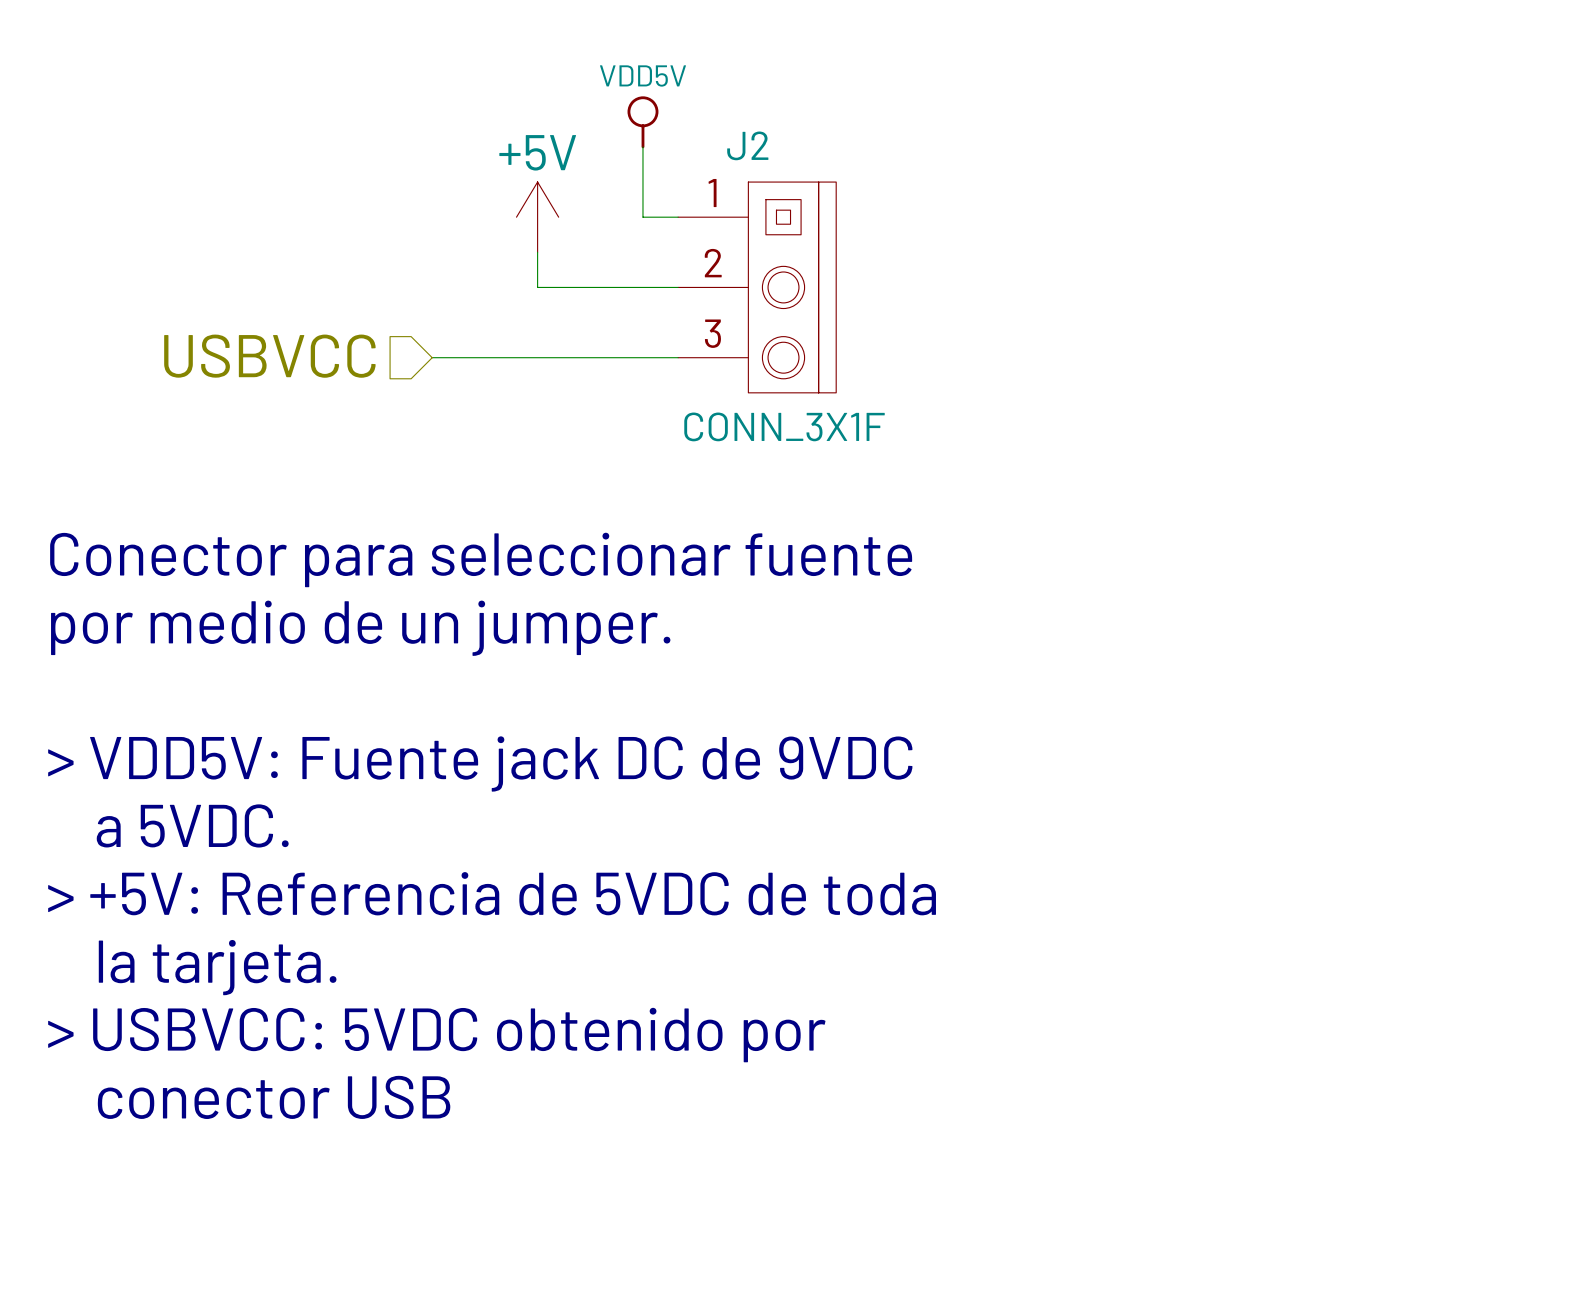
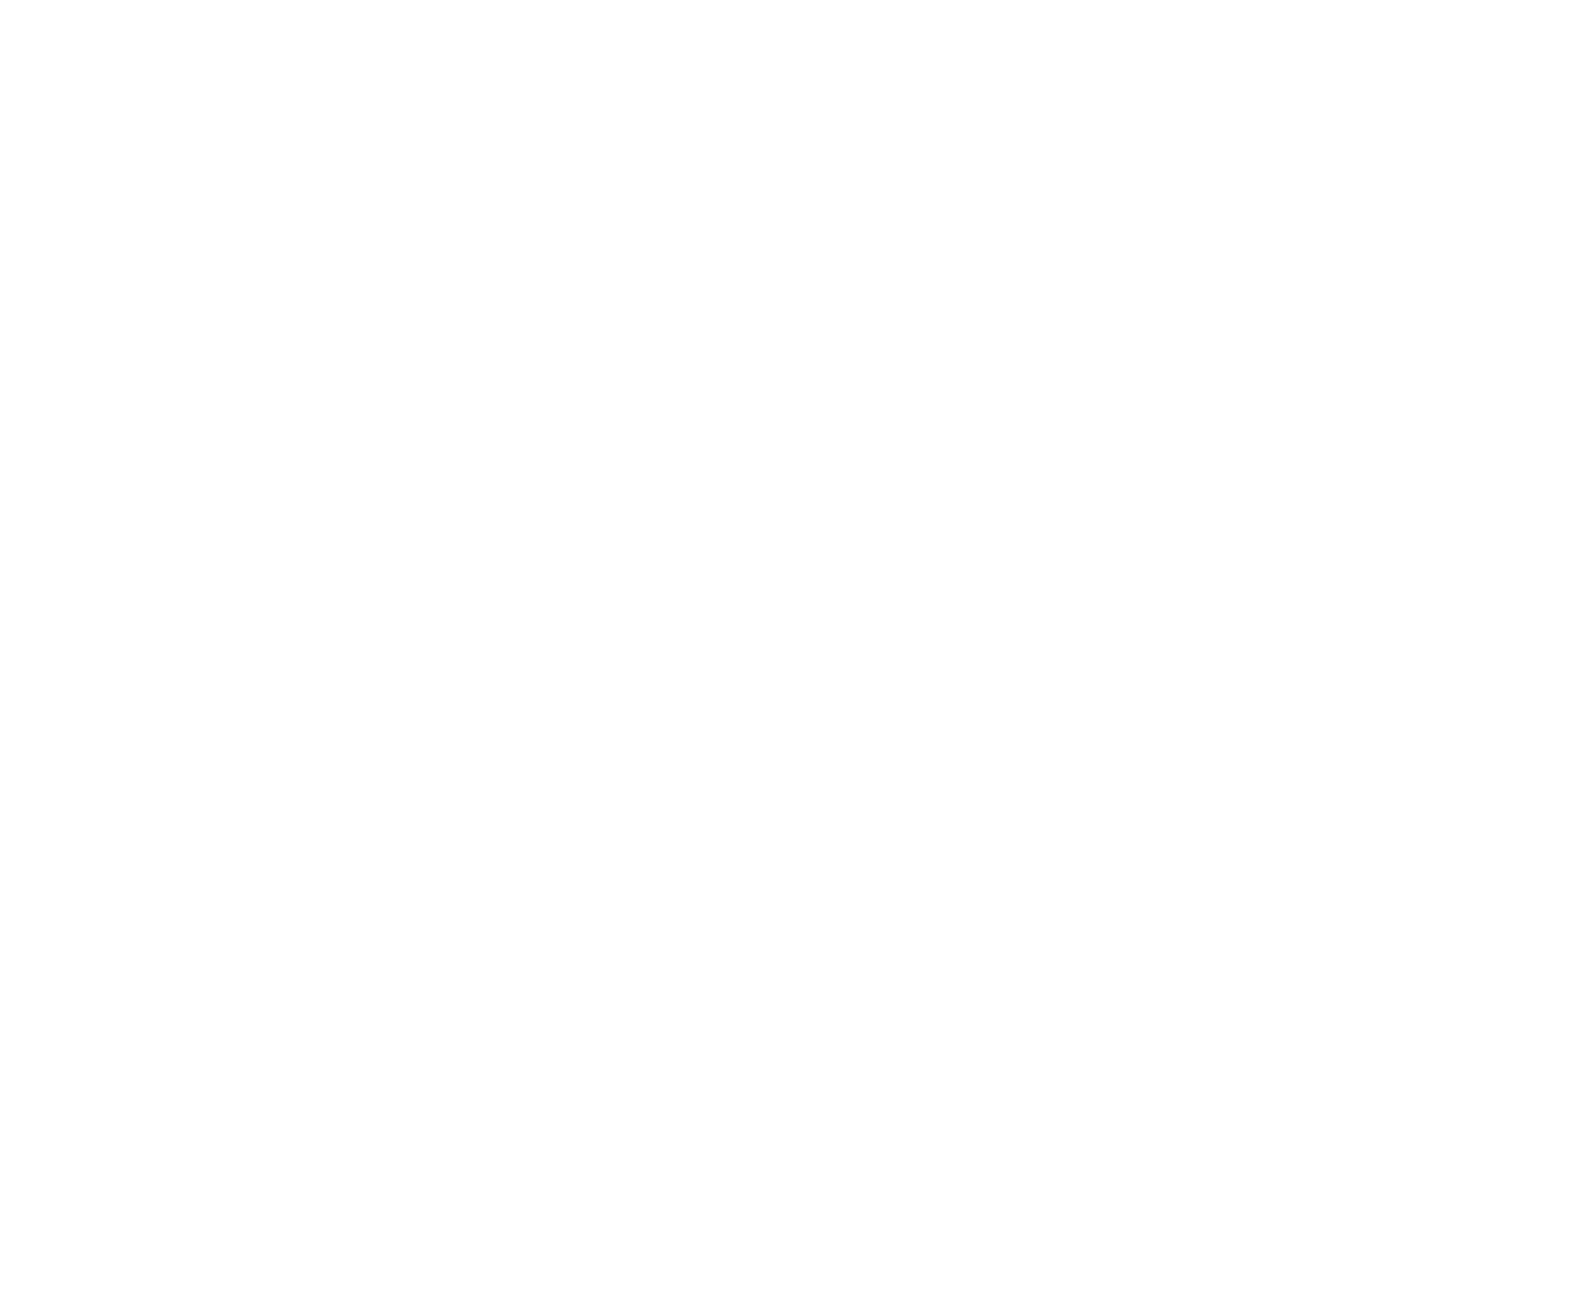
power symbol: VDD5V (642, 122) -> none
wire: (642, 146) (642, 217) (678, 217) -> none
power symbol: +5V (537, 217) -> none
wire: (537, 252) (537, 287) (678, 287) -> none
J2: CONN_3X1F (757, 287) -> none
hierarchical label: USBVCC (269, 356) -> none
wire: (432, 357) (678, 357) -> none
text: Conector para seleccionar fuente (481, 559) -> none
text: por medio de un jumper. (360, 628) -> none
text: > VDD5V: Fuente jack DC de 9VDC (480, 764) -> none
text: a 5VDC. (192, 825) -> none
text: > +5V: Referencia de 5VDC de toda (492, 893) -> none
text: la tarjeta. (217, 967) -> none
text: > USBVCC: 5VDC obtenido por (436, 1035) -> none
text: conector USB (274, 1097) -> none

